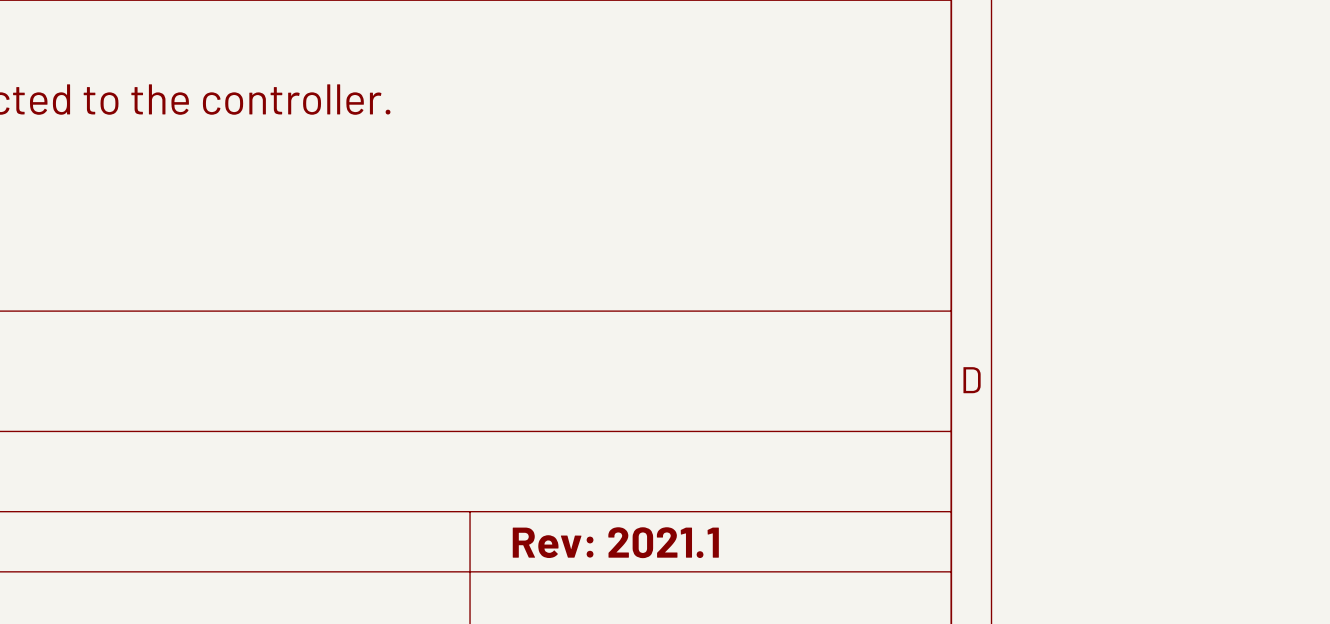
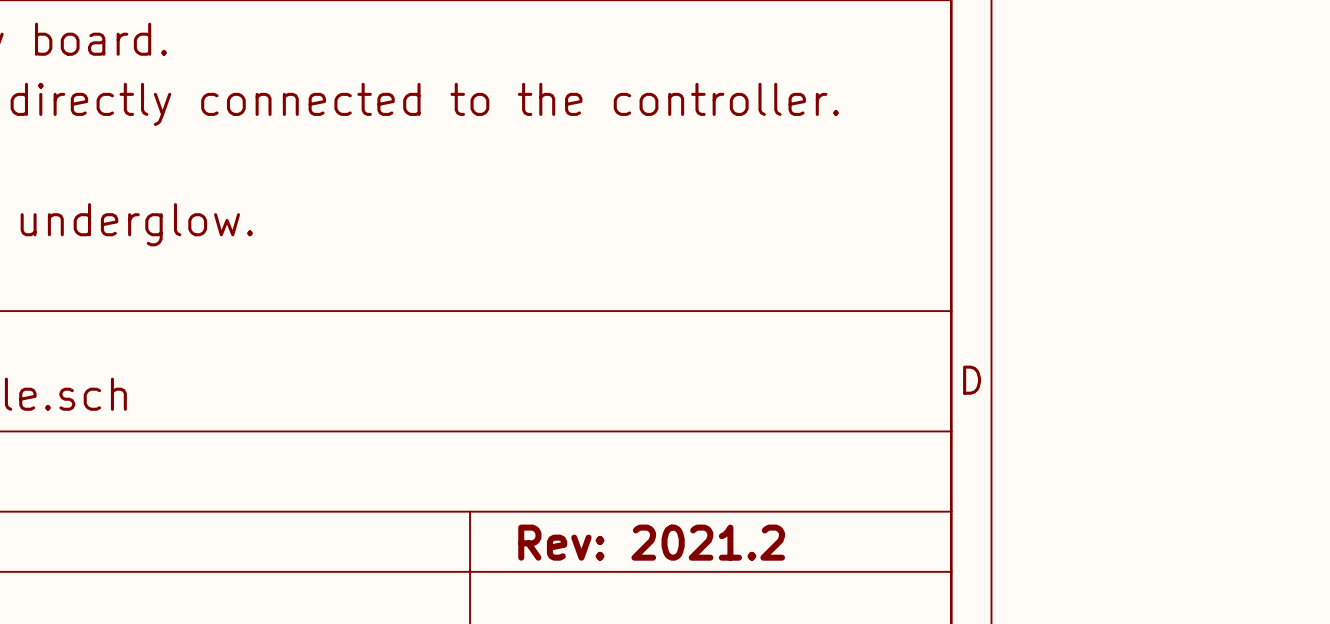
title block: Rev: 2021.1 (615, 542) -> Rev: 2021.2 (651, 542)

